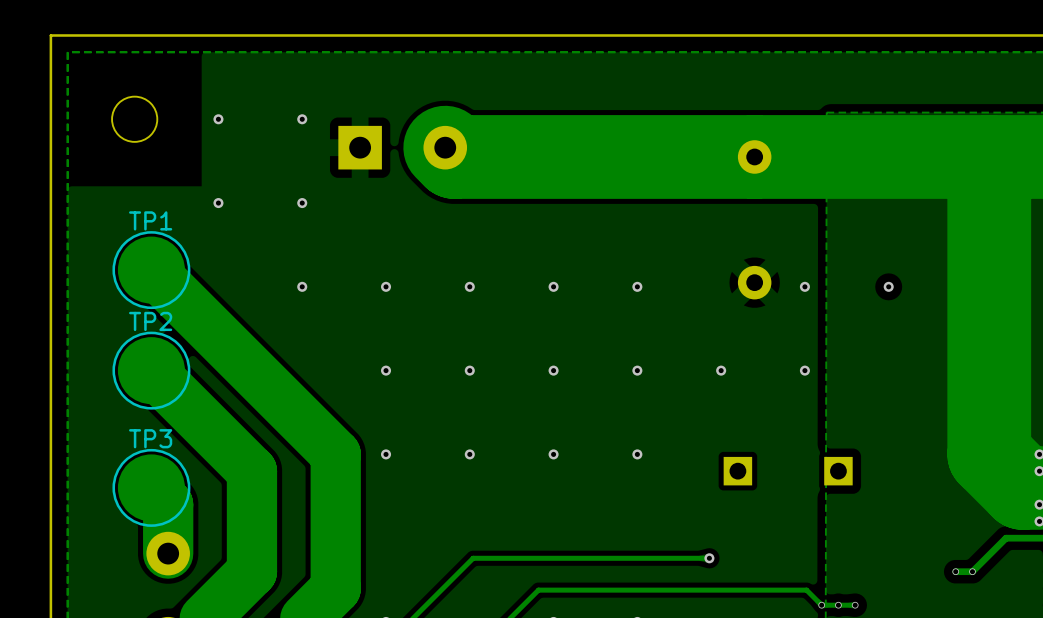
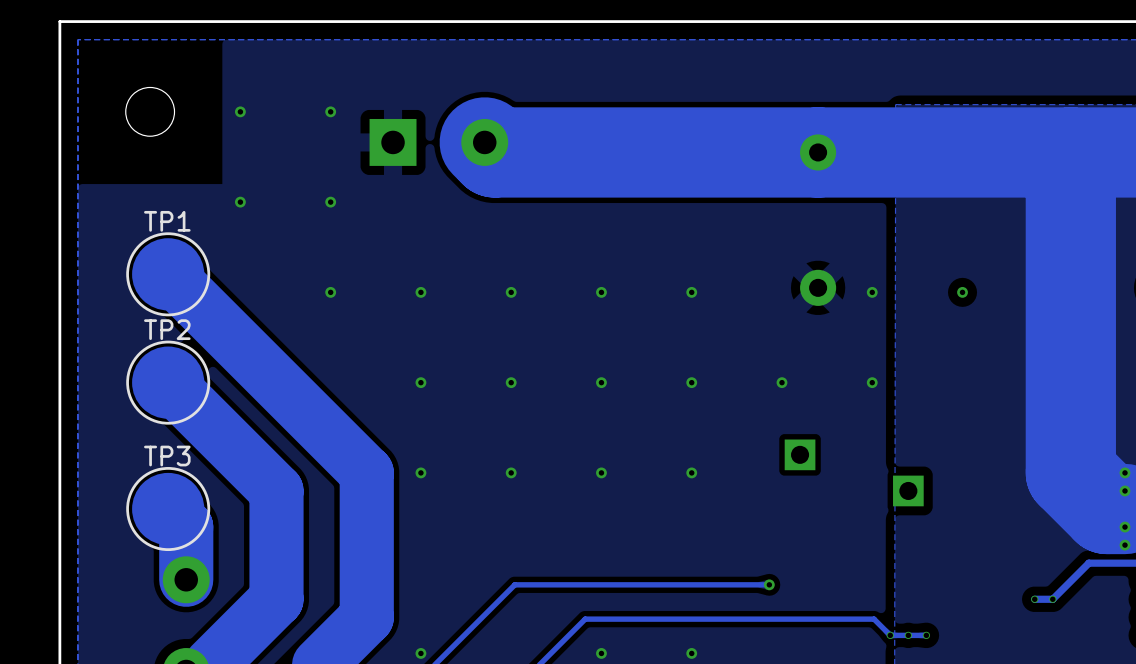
part position: (737, 471) -> (800, 454)

